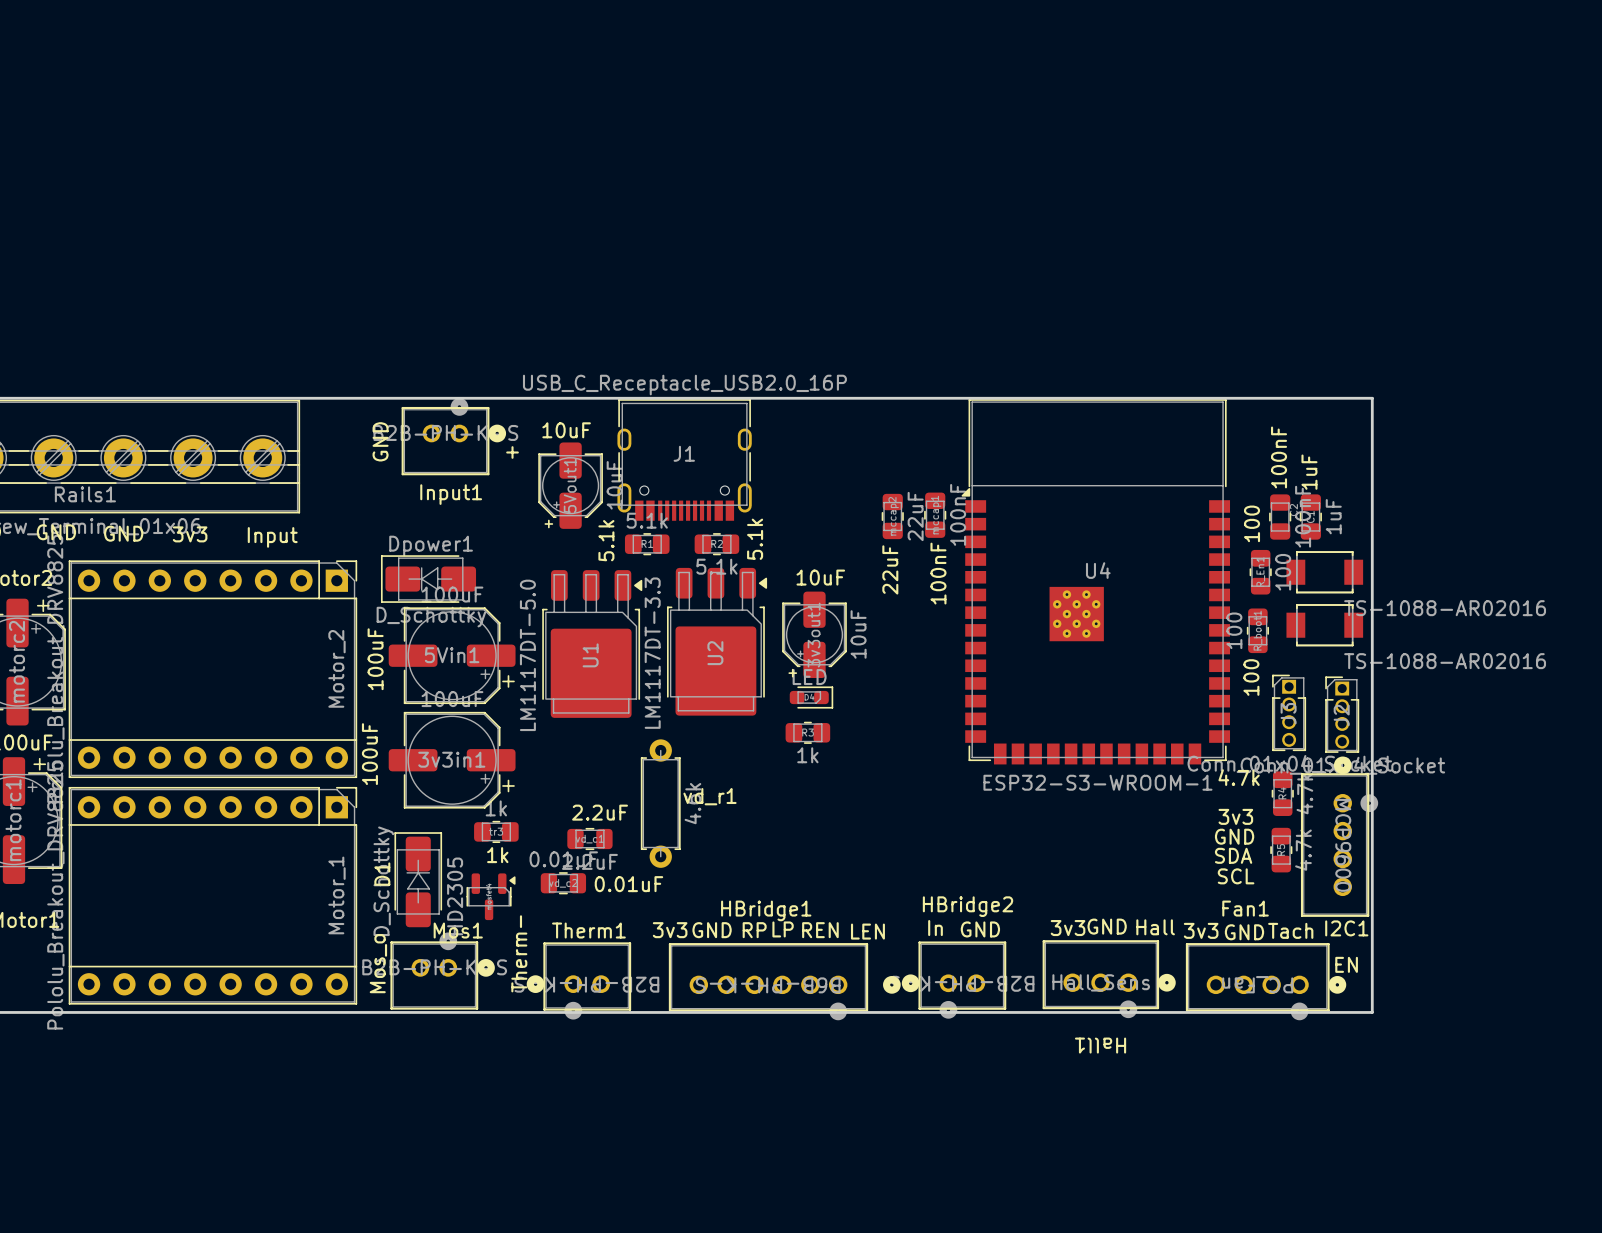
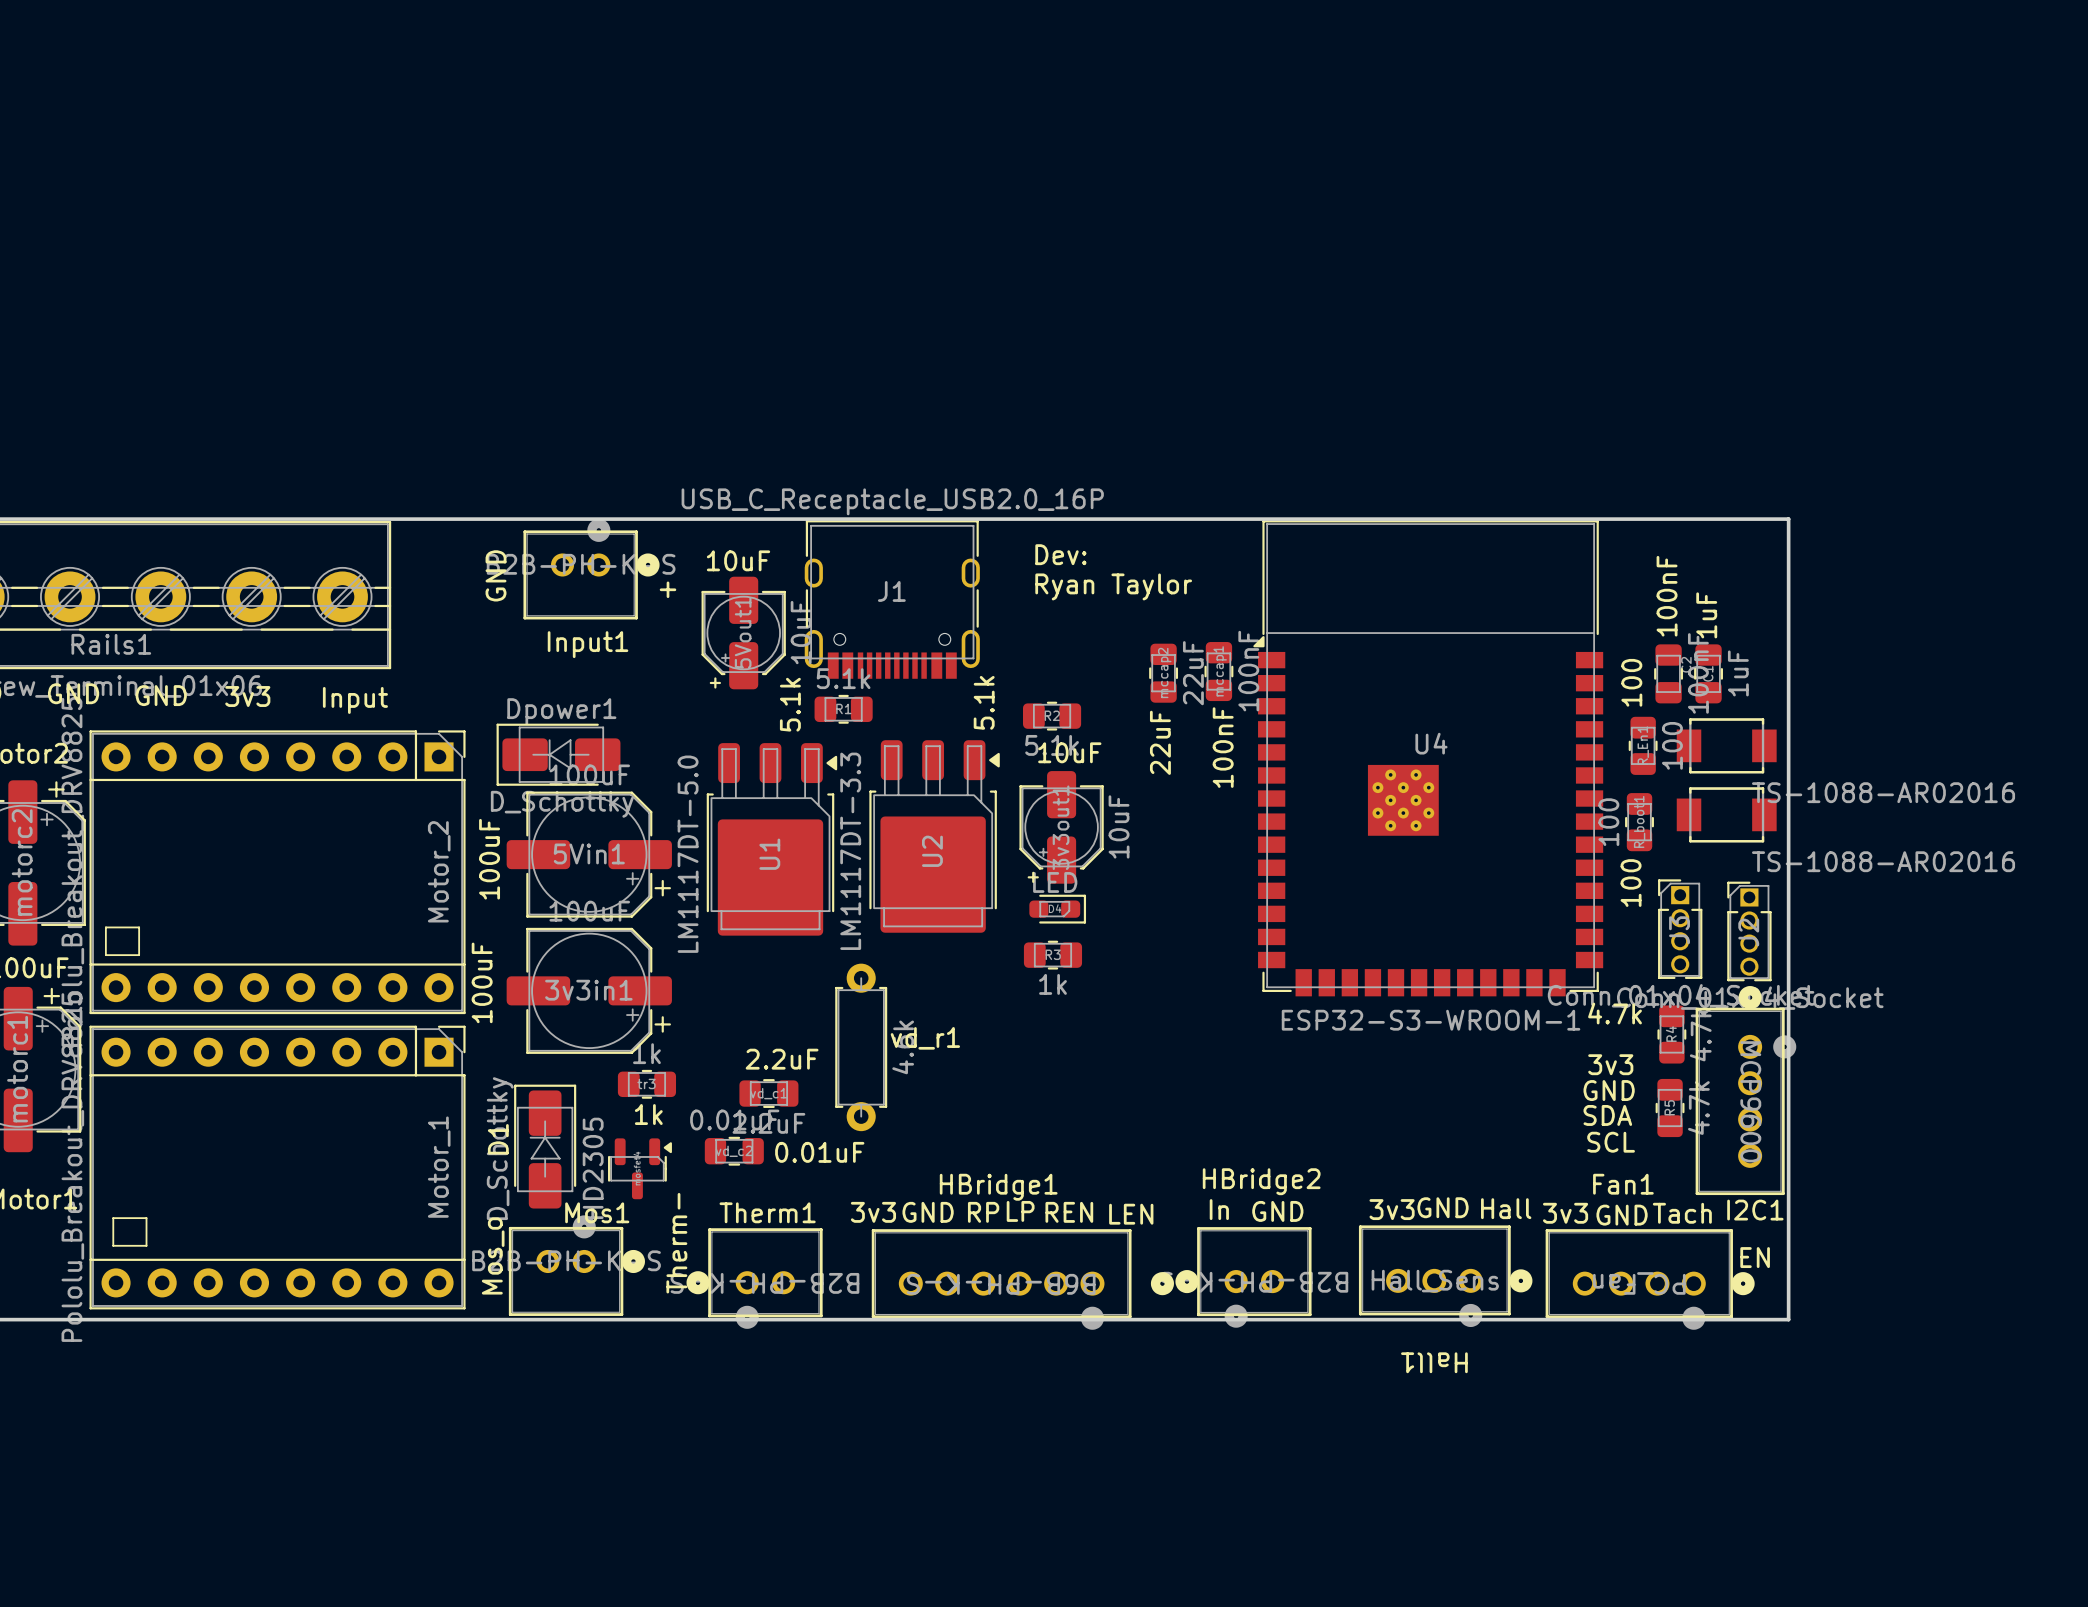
text: none -> Dev: (1060, 554)
text: none -> Ryan Taylor (1113, 586)
R2 position: (716, 544) -> (1052, 716)
line: none -> (105, 927) (139, 927) (139, 955) (105, 955) (105, 927)
line: none -> (113, 1218) (146, 1218) (146, 1245) (113, 1245) (113, 1218)

